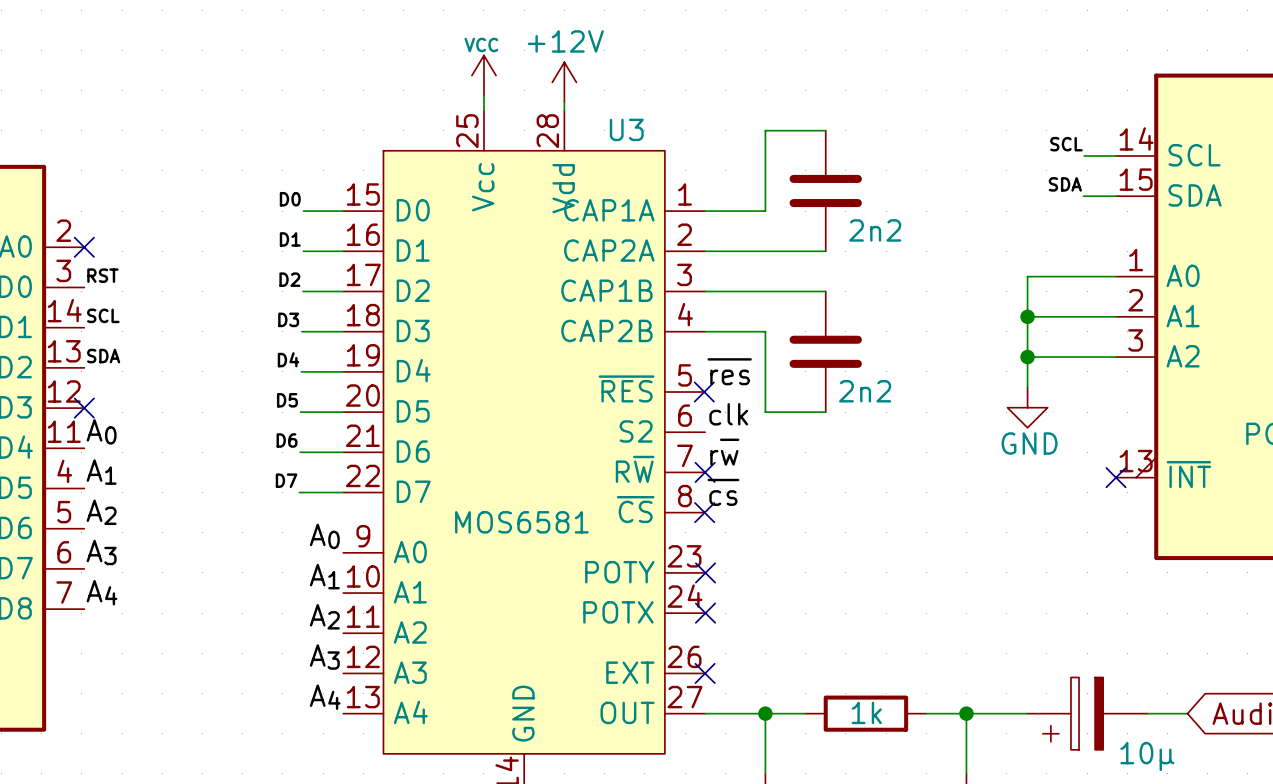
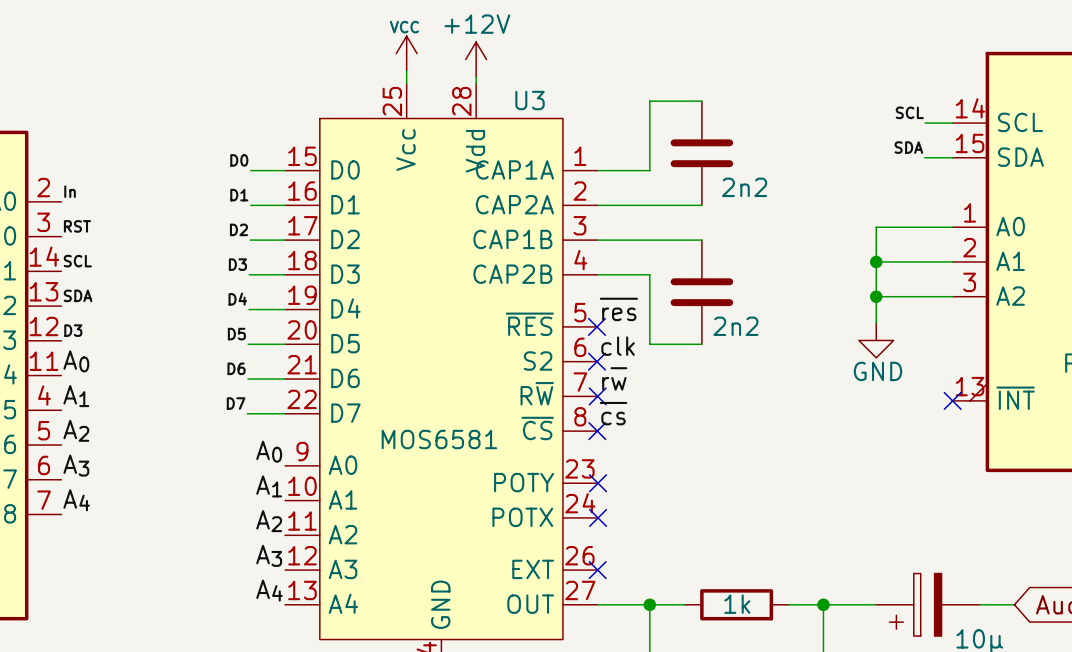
label: none -> In (70, 191)
no-connect mark: (84, 247) -> none
label: none -> D3 (73, 330)
no-connect mark: (84, 408) -> none
no-connect mark: none -> (597, 361)

